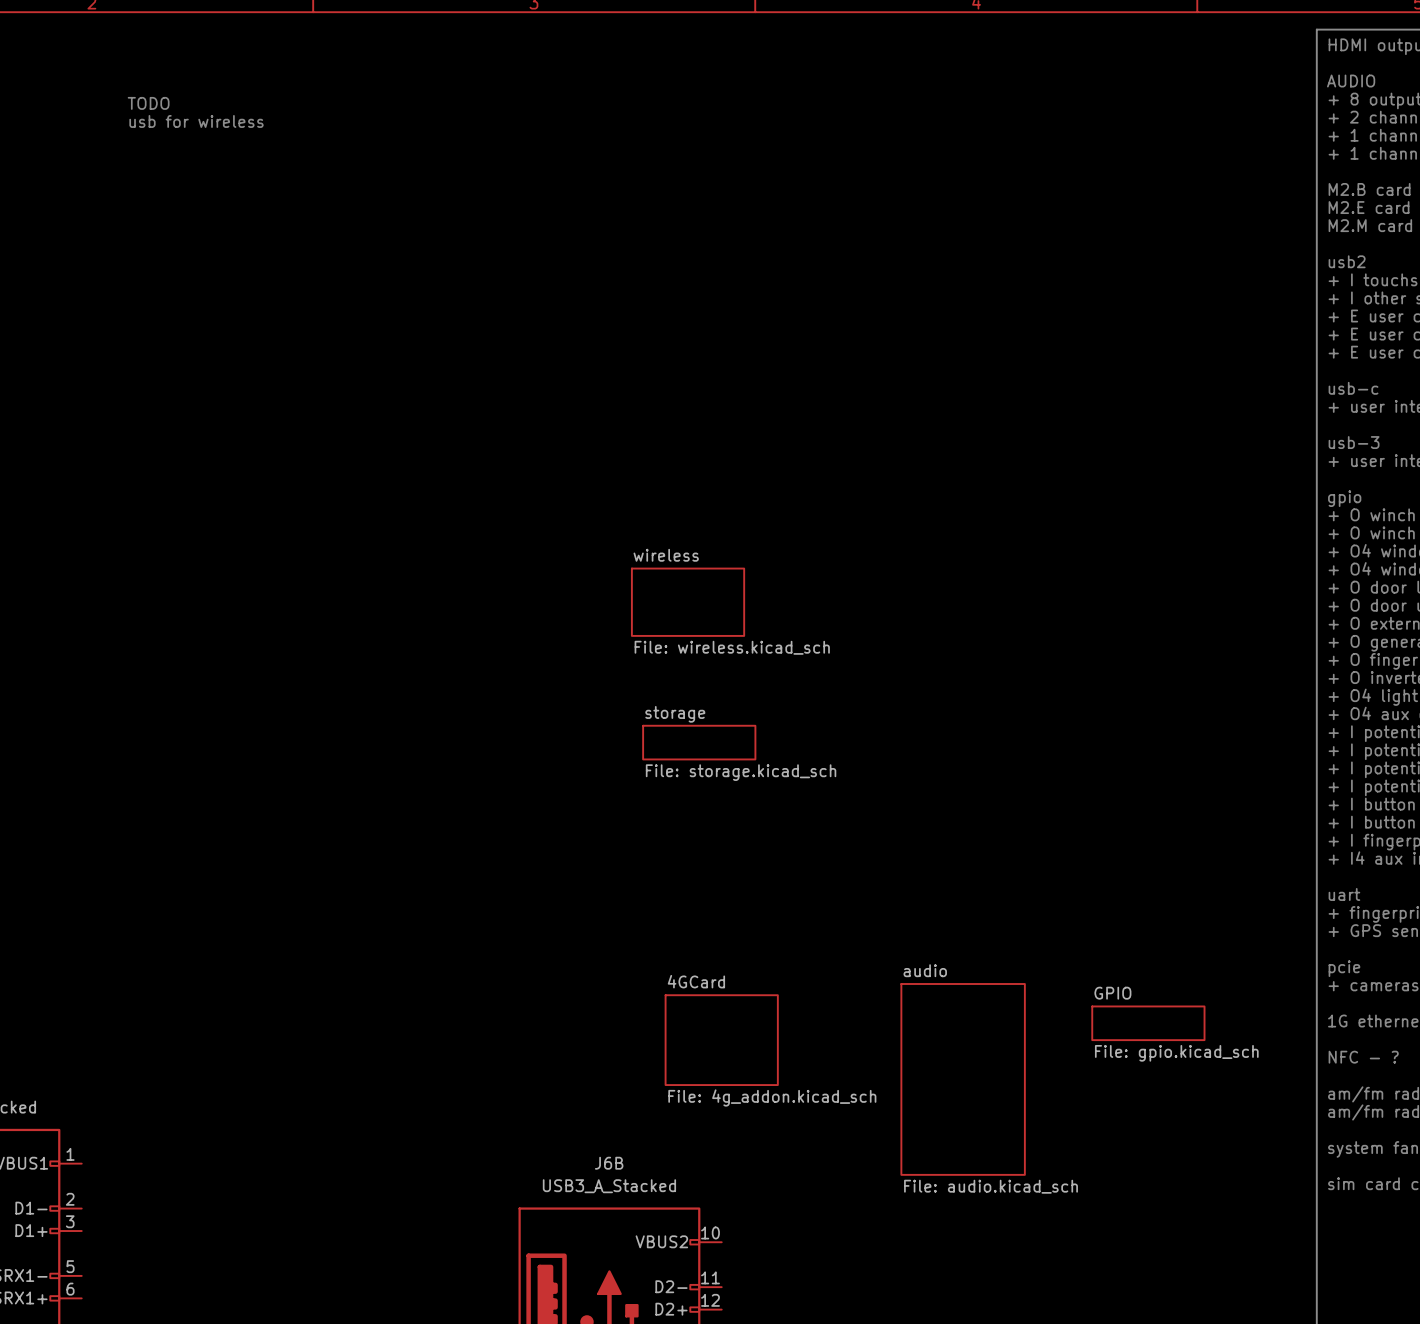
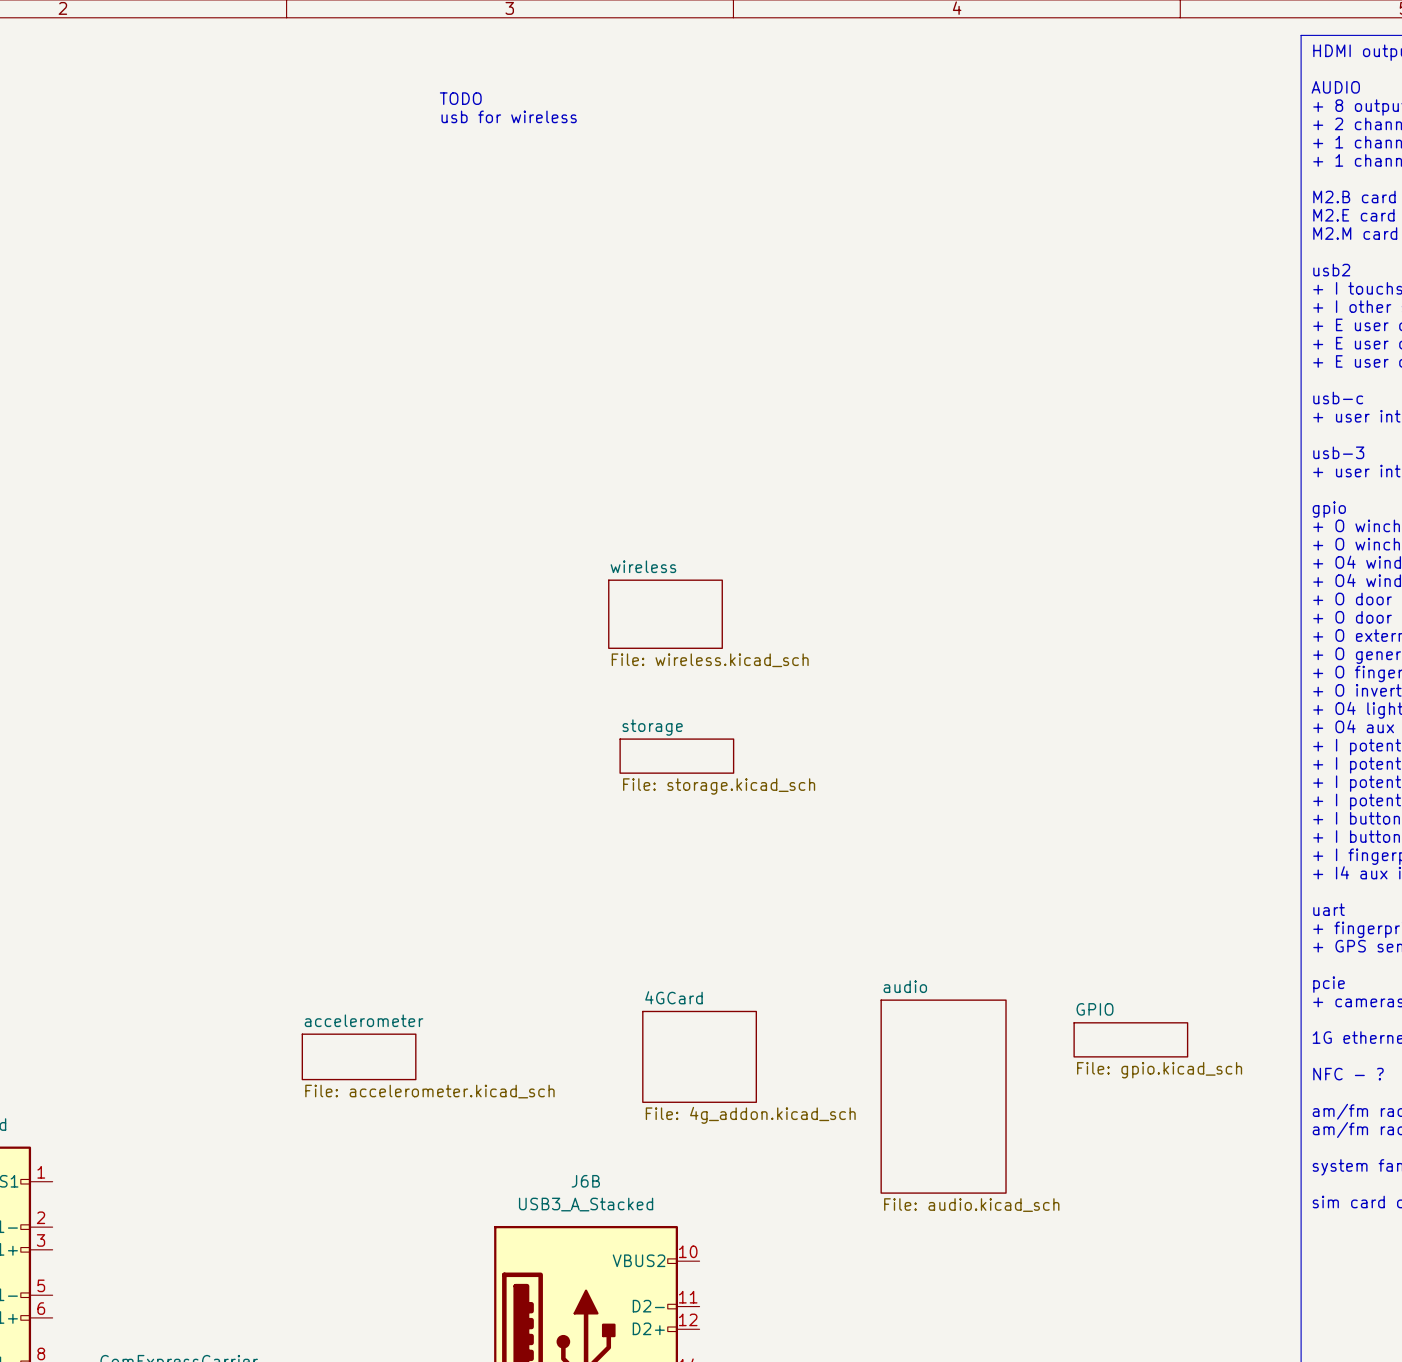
text: none -> TODO (460, 98)
text: TODO (148, 103) -> none
text: none -> usb for wireless (509, 116)
text: usb for wireless (196, 121) -> none
sheet accelerometer: none -> File: accelerometer.kicad_sch (359, 1056)

